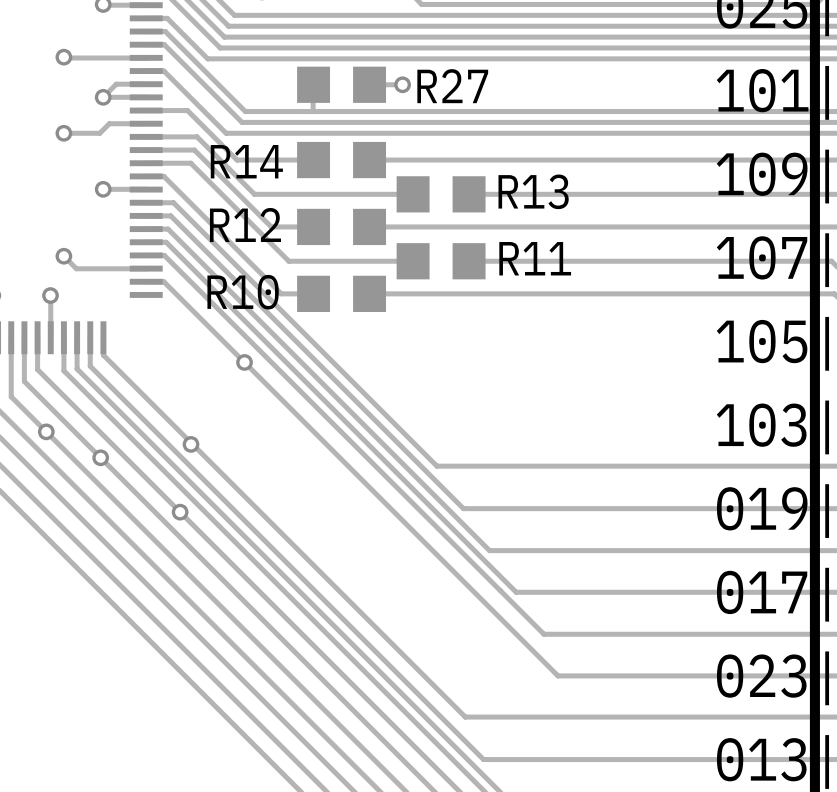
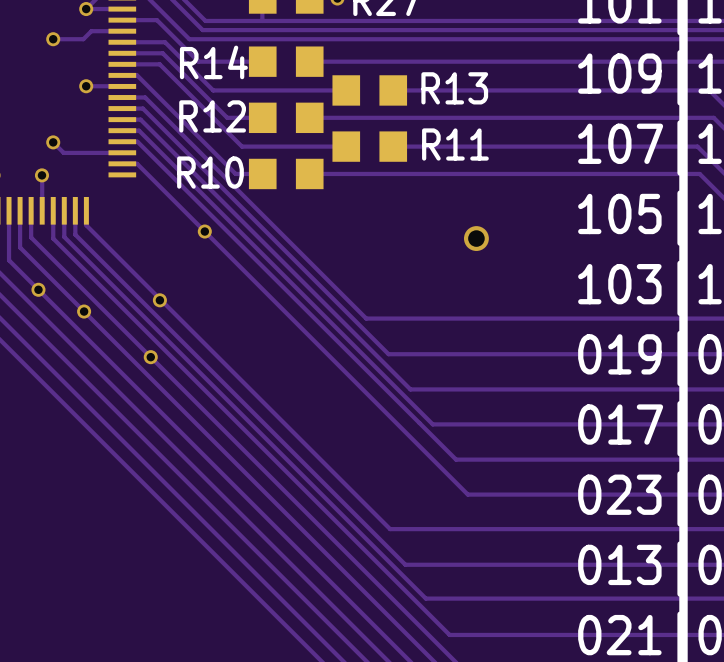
via: none -> (476, 238)

